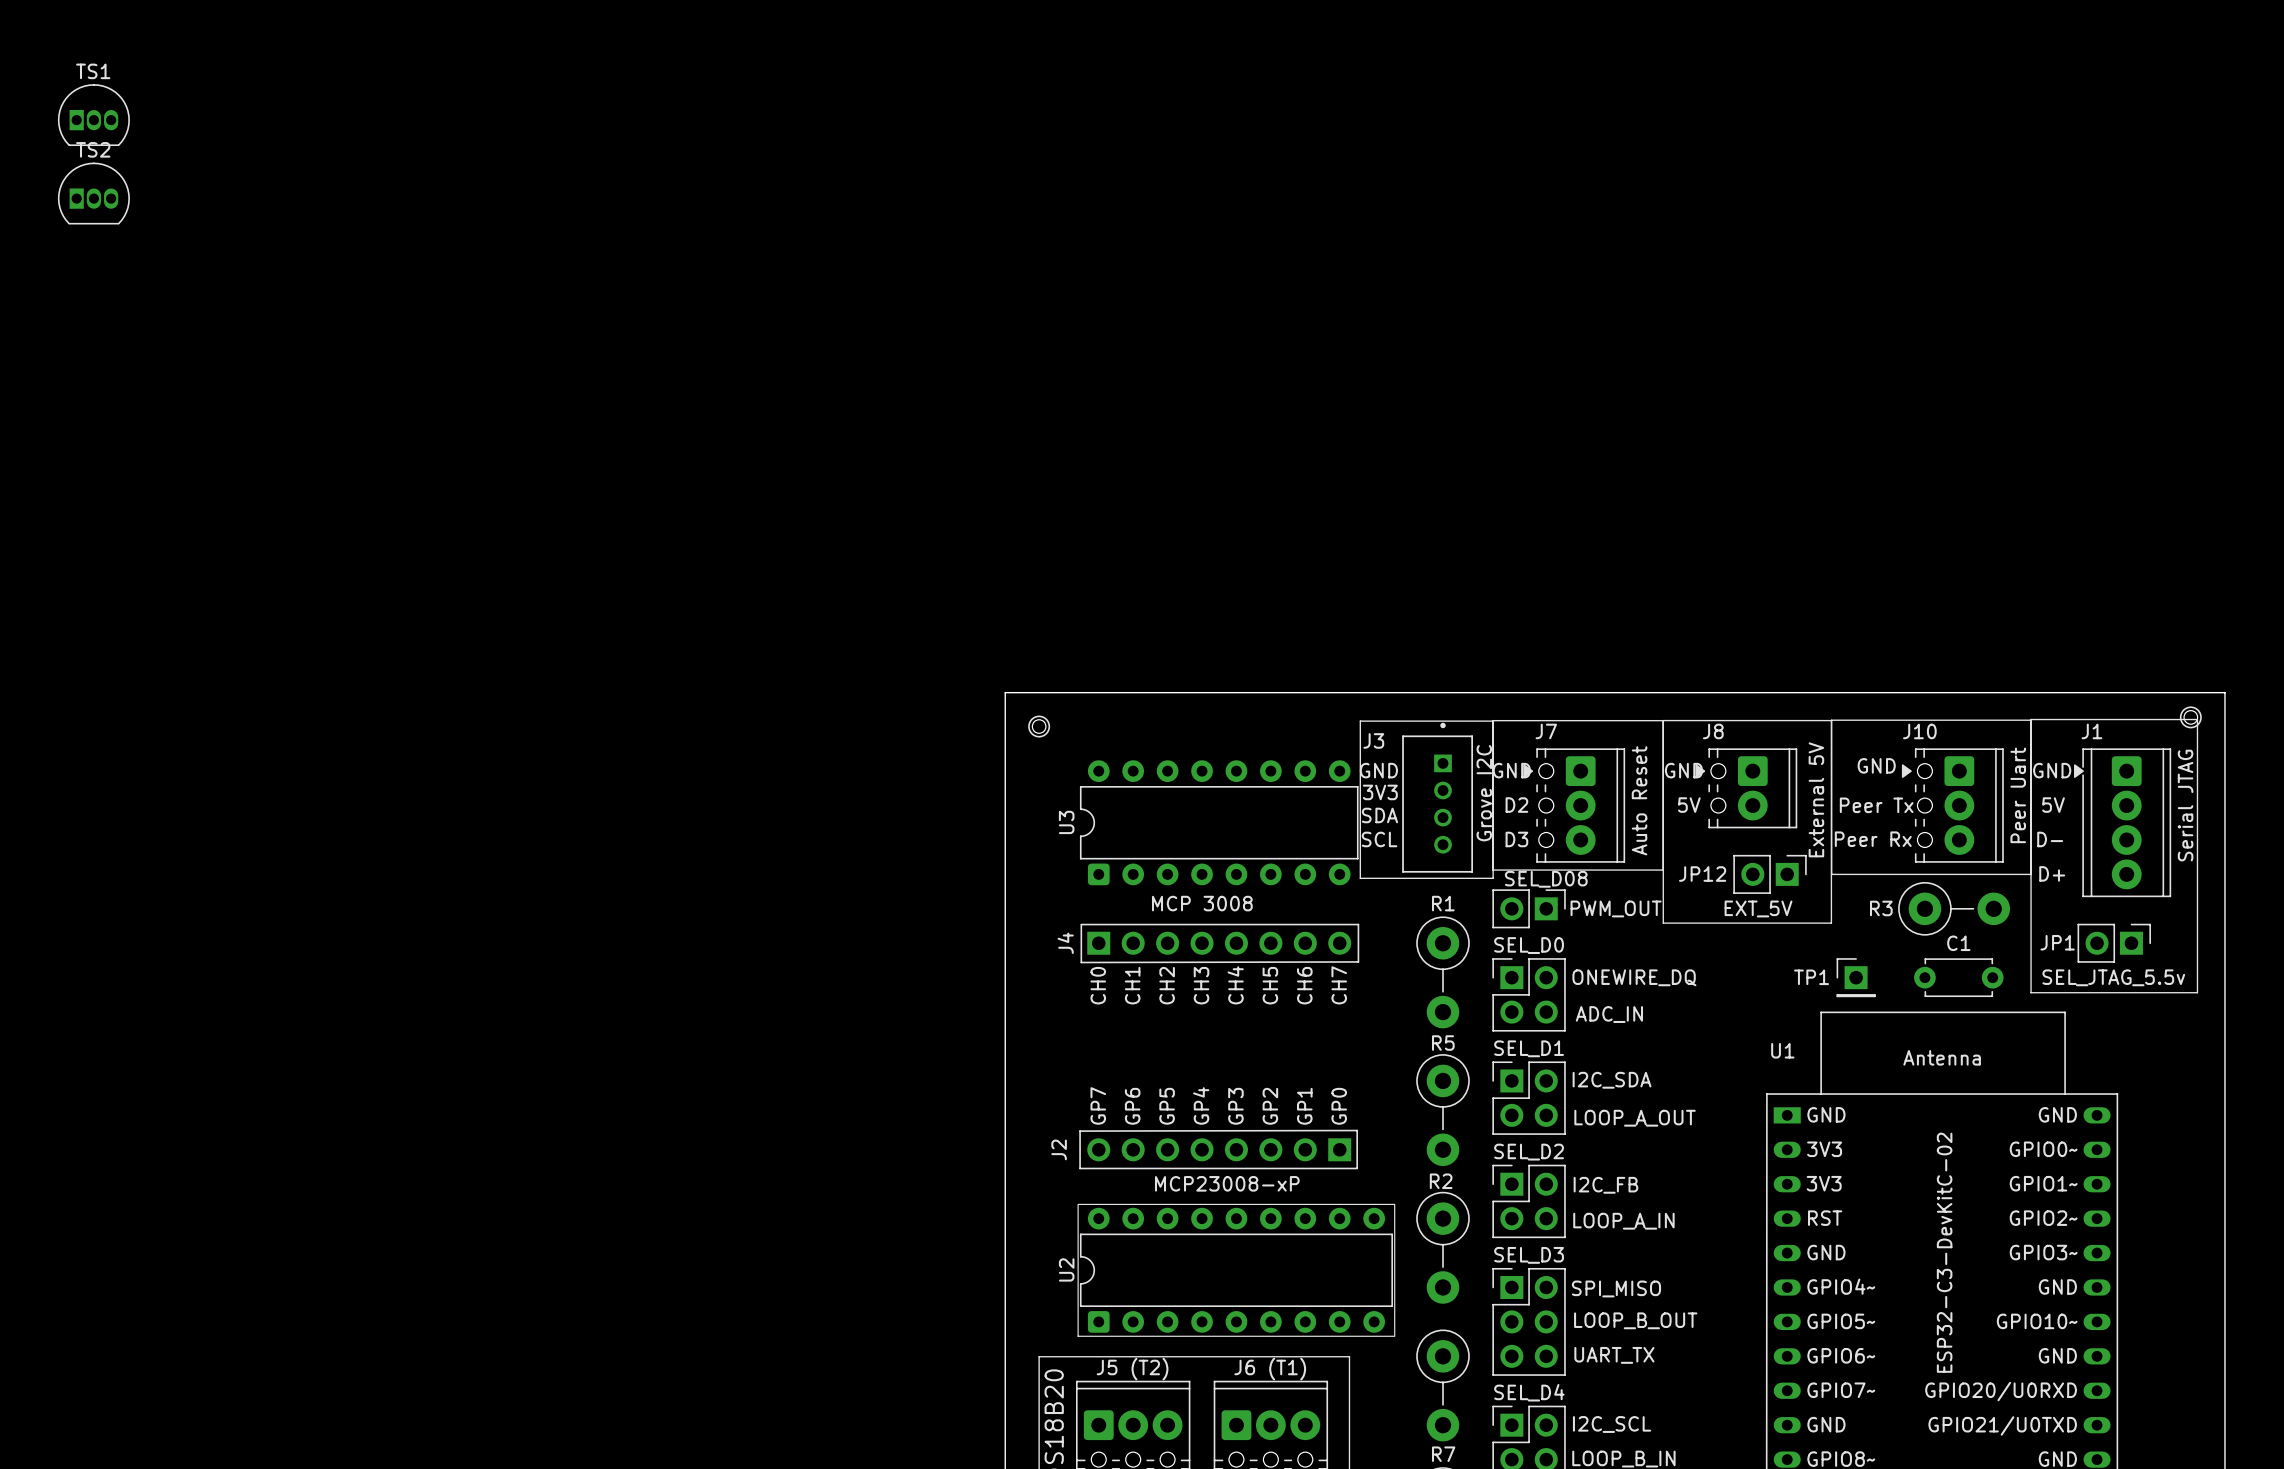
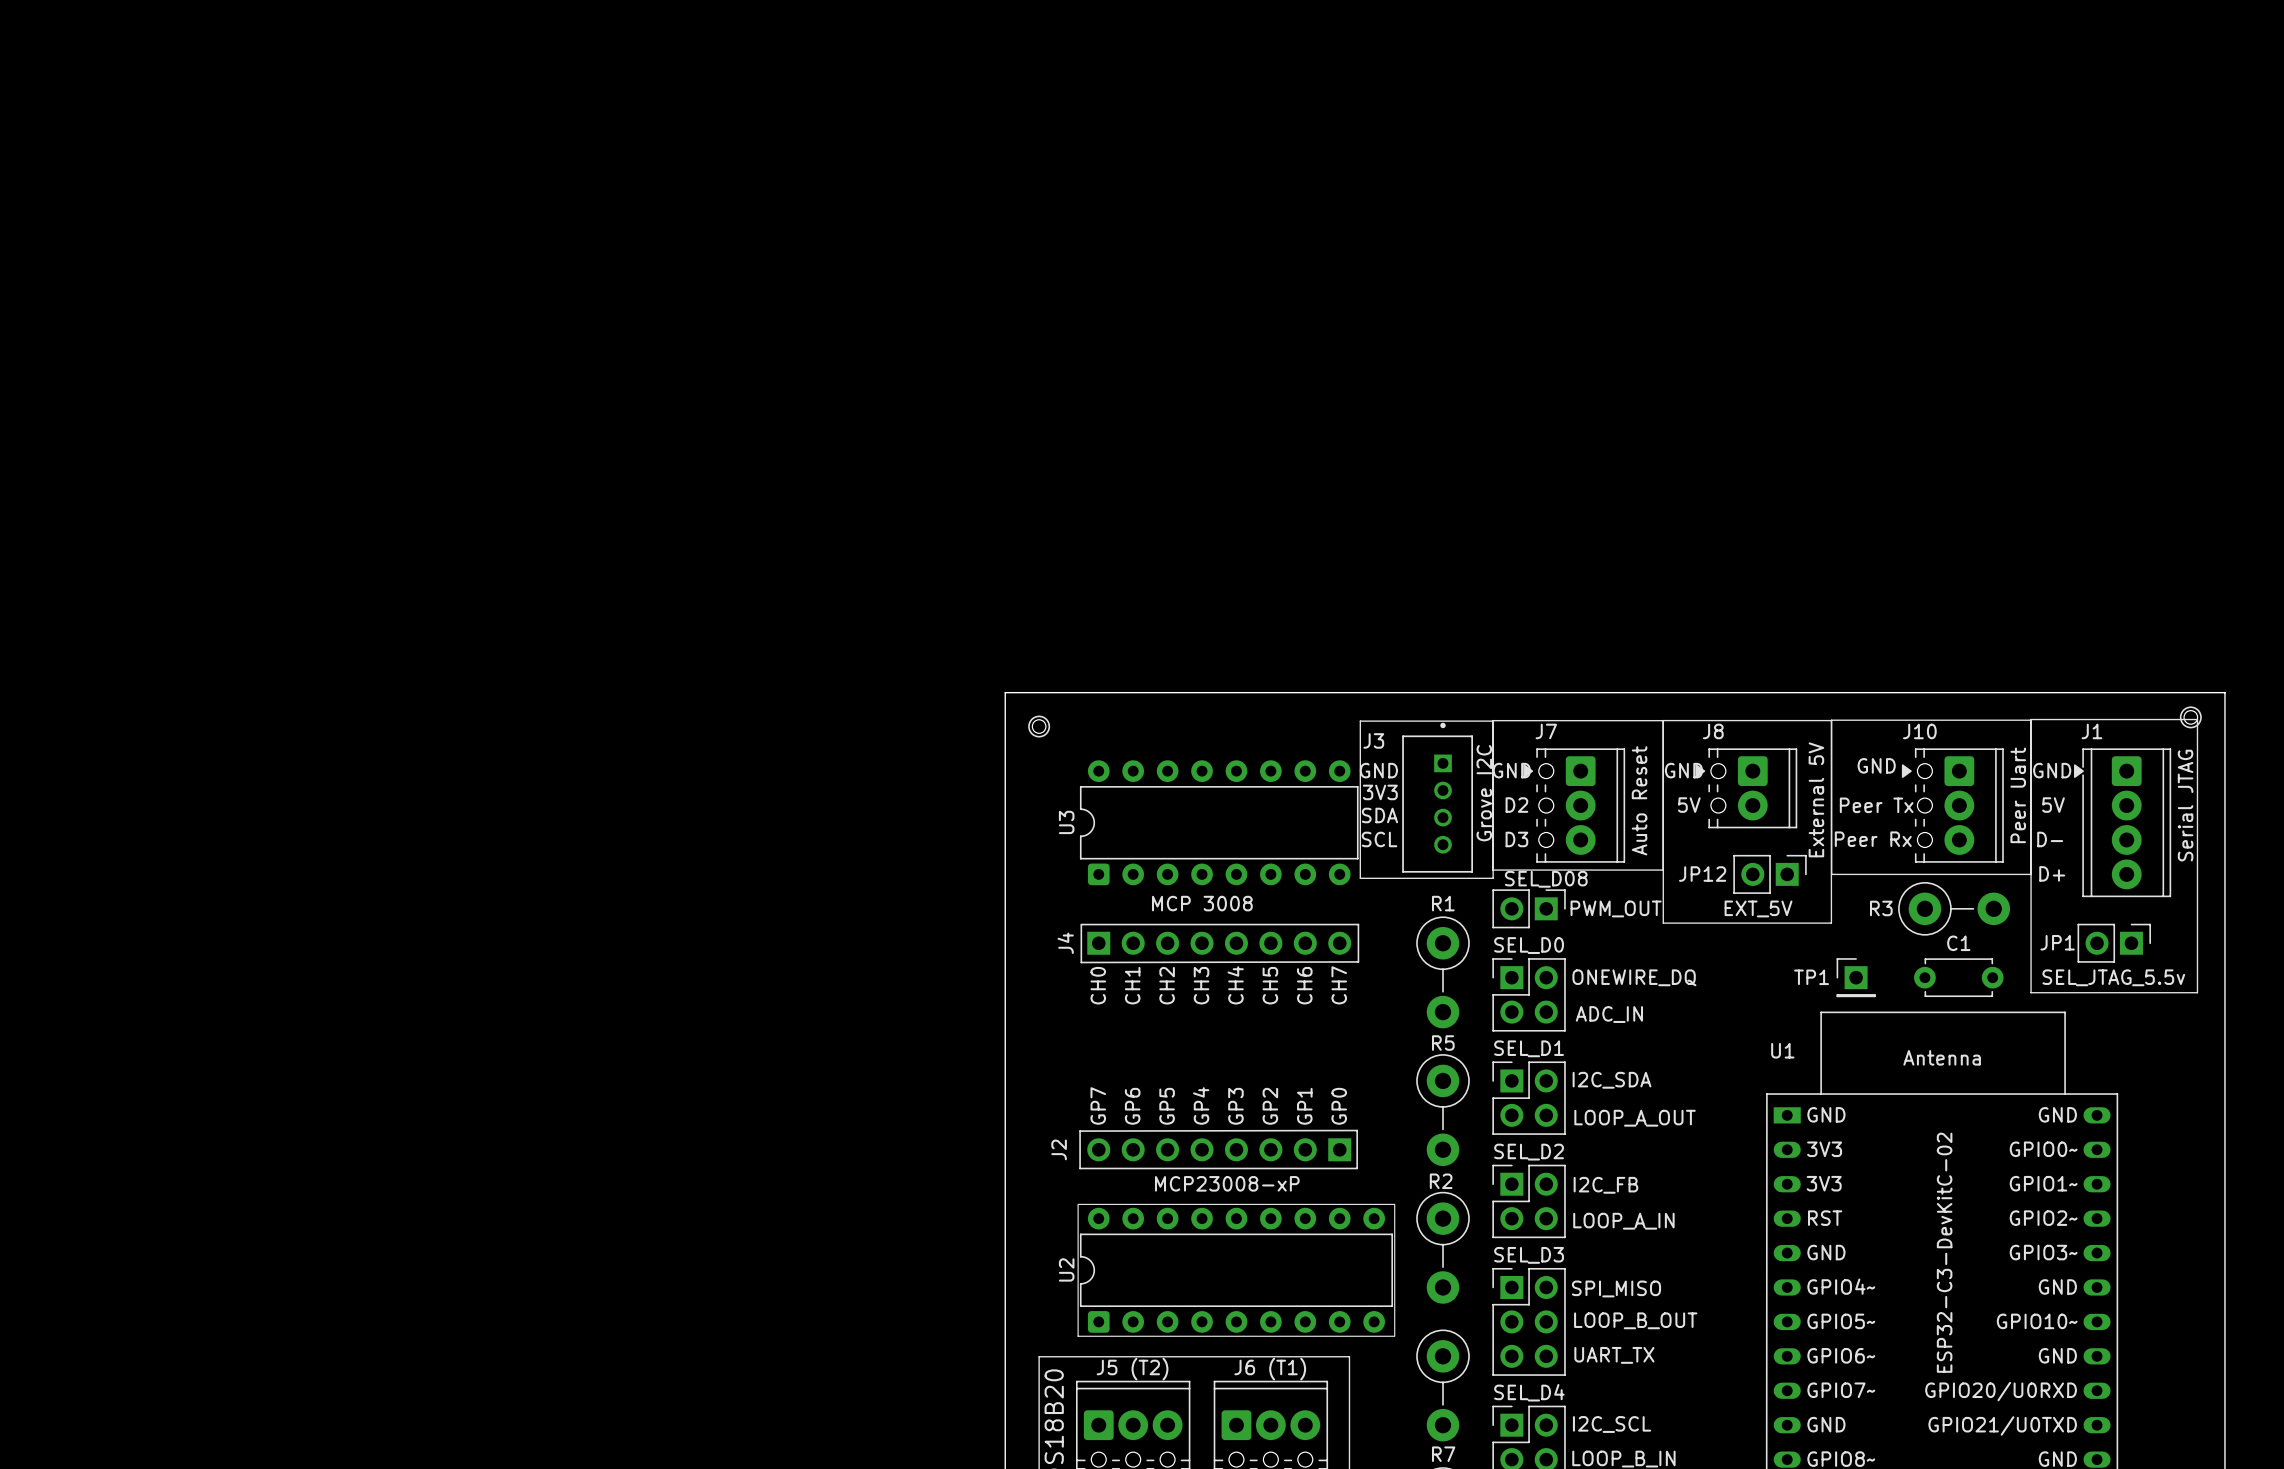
TS1: (93, 115) -> none
TS2: (93, 193) -> none

